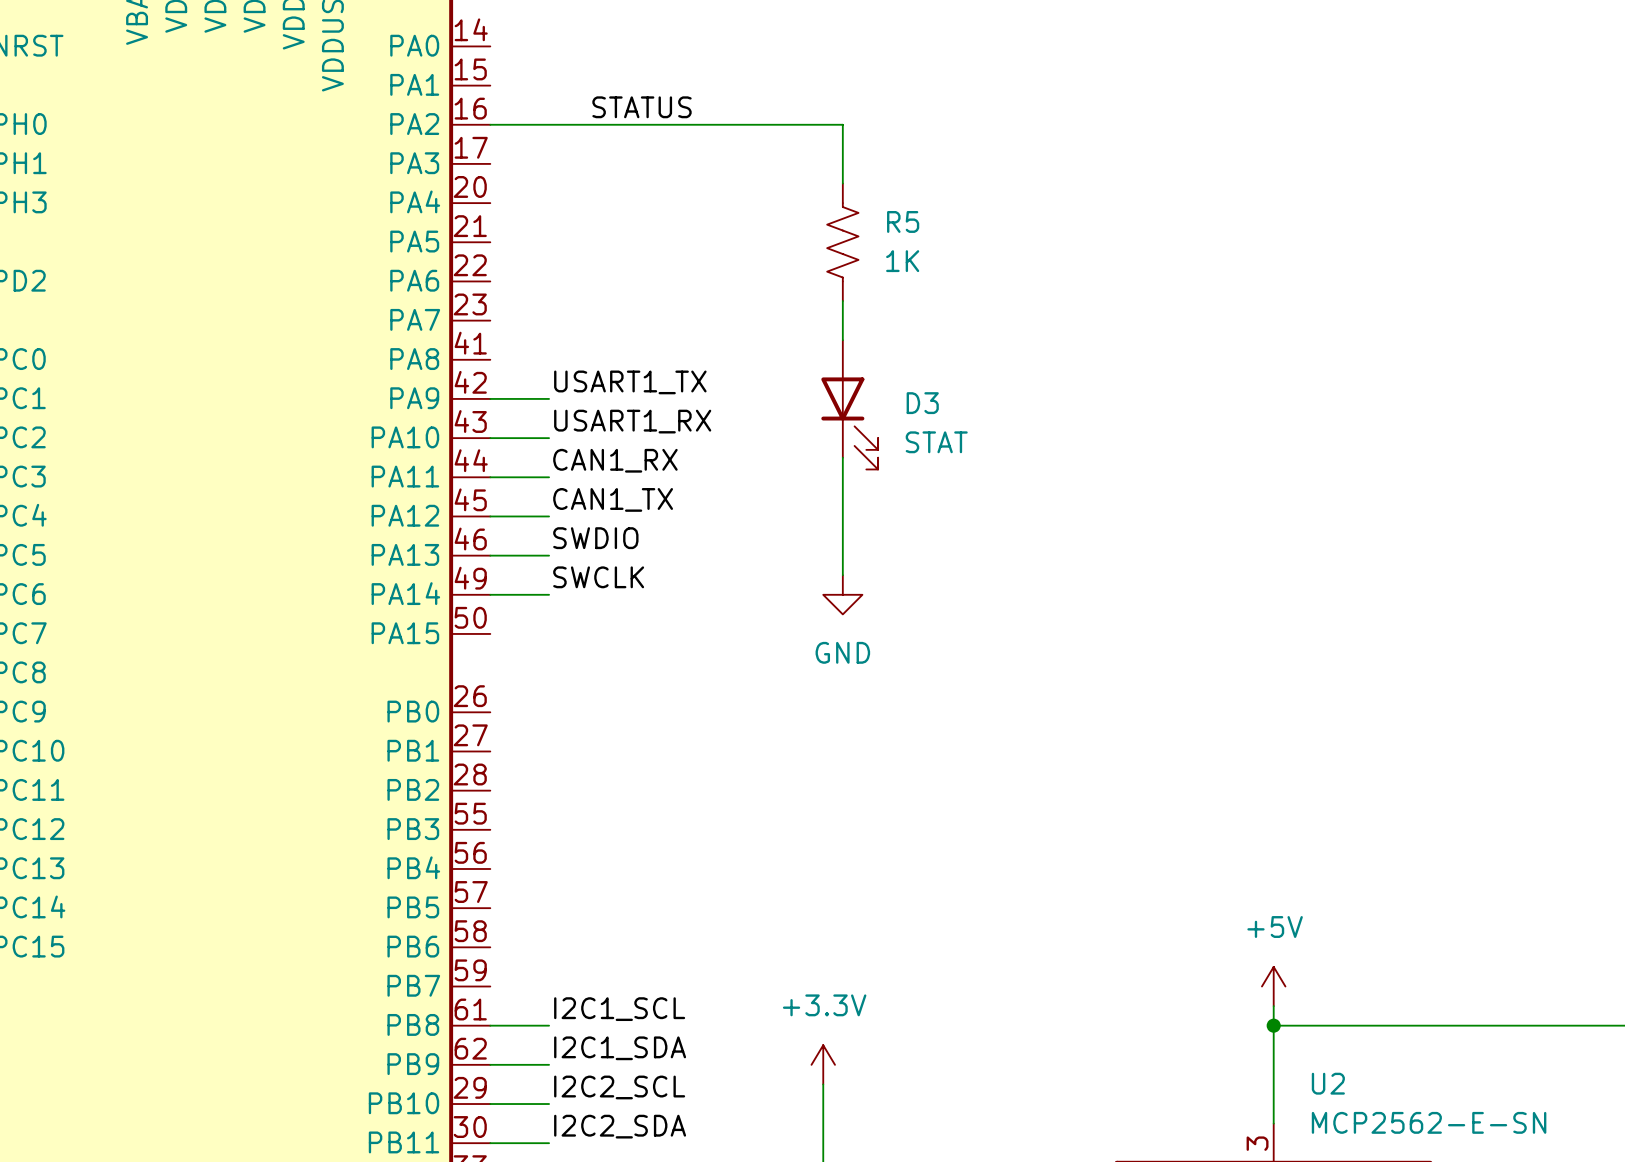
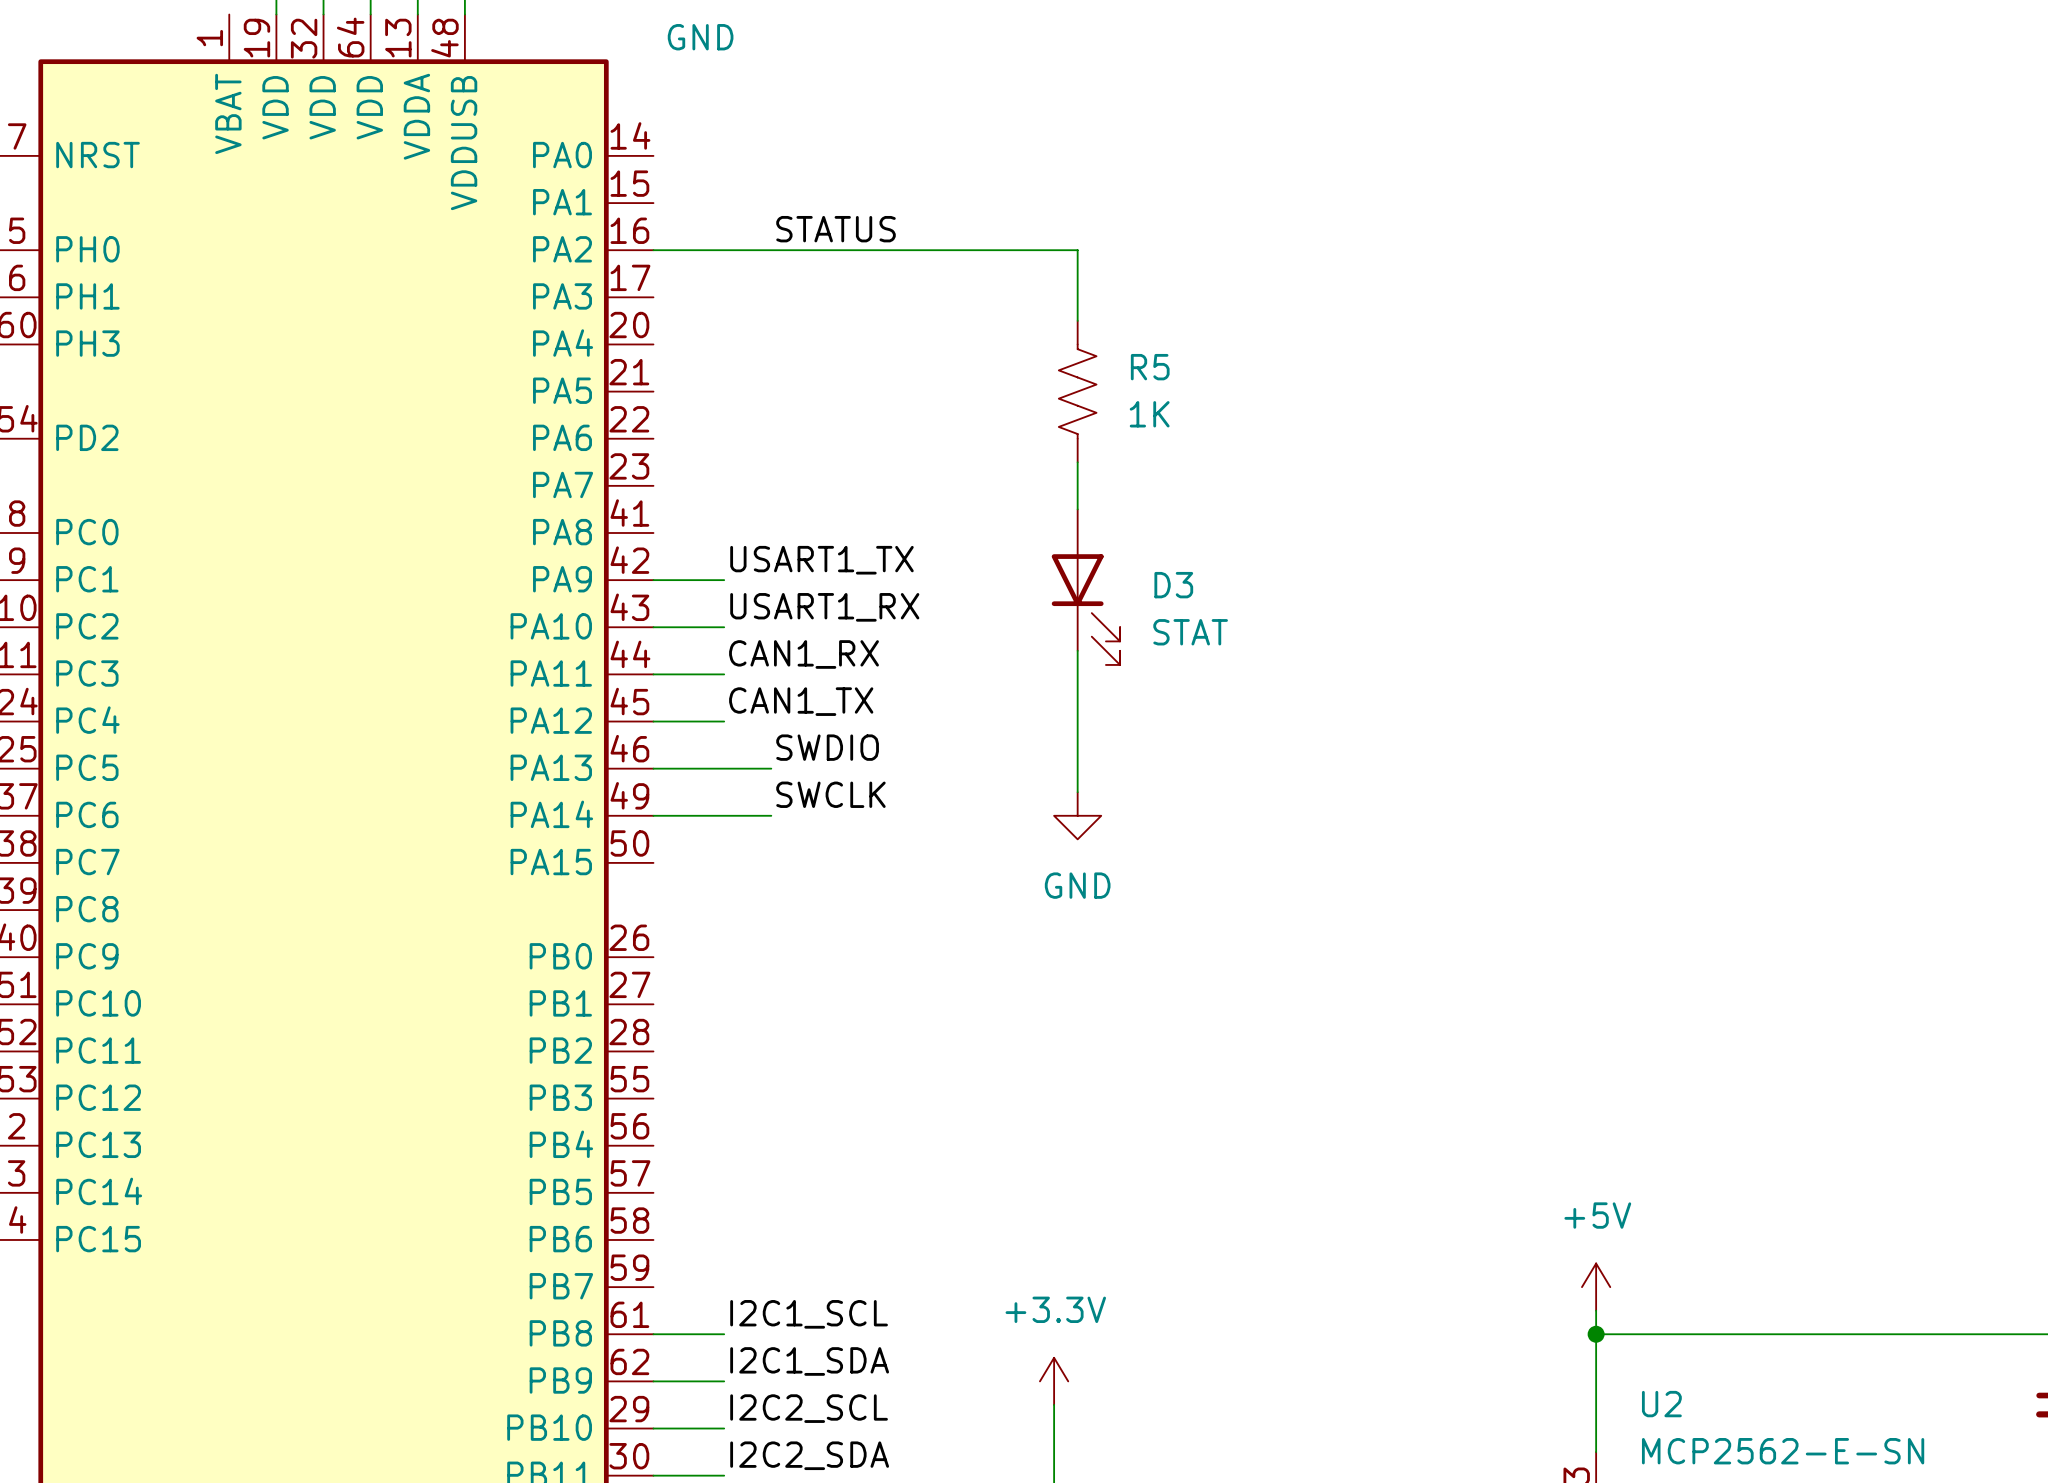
label position: SWDIO (595, 538) -> SWDIO (827, 747)
wire: none -> (724, 768) (771, 768)
label position: SWCLK (598, 577) -> SWCLK (830, 794)
wire: none -> (724, 815) (771, 815)

